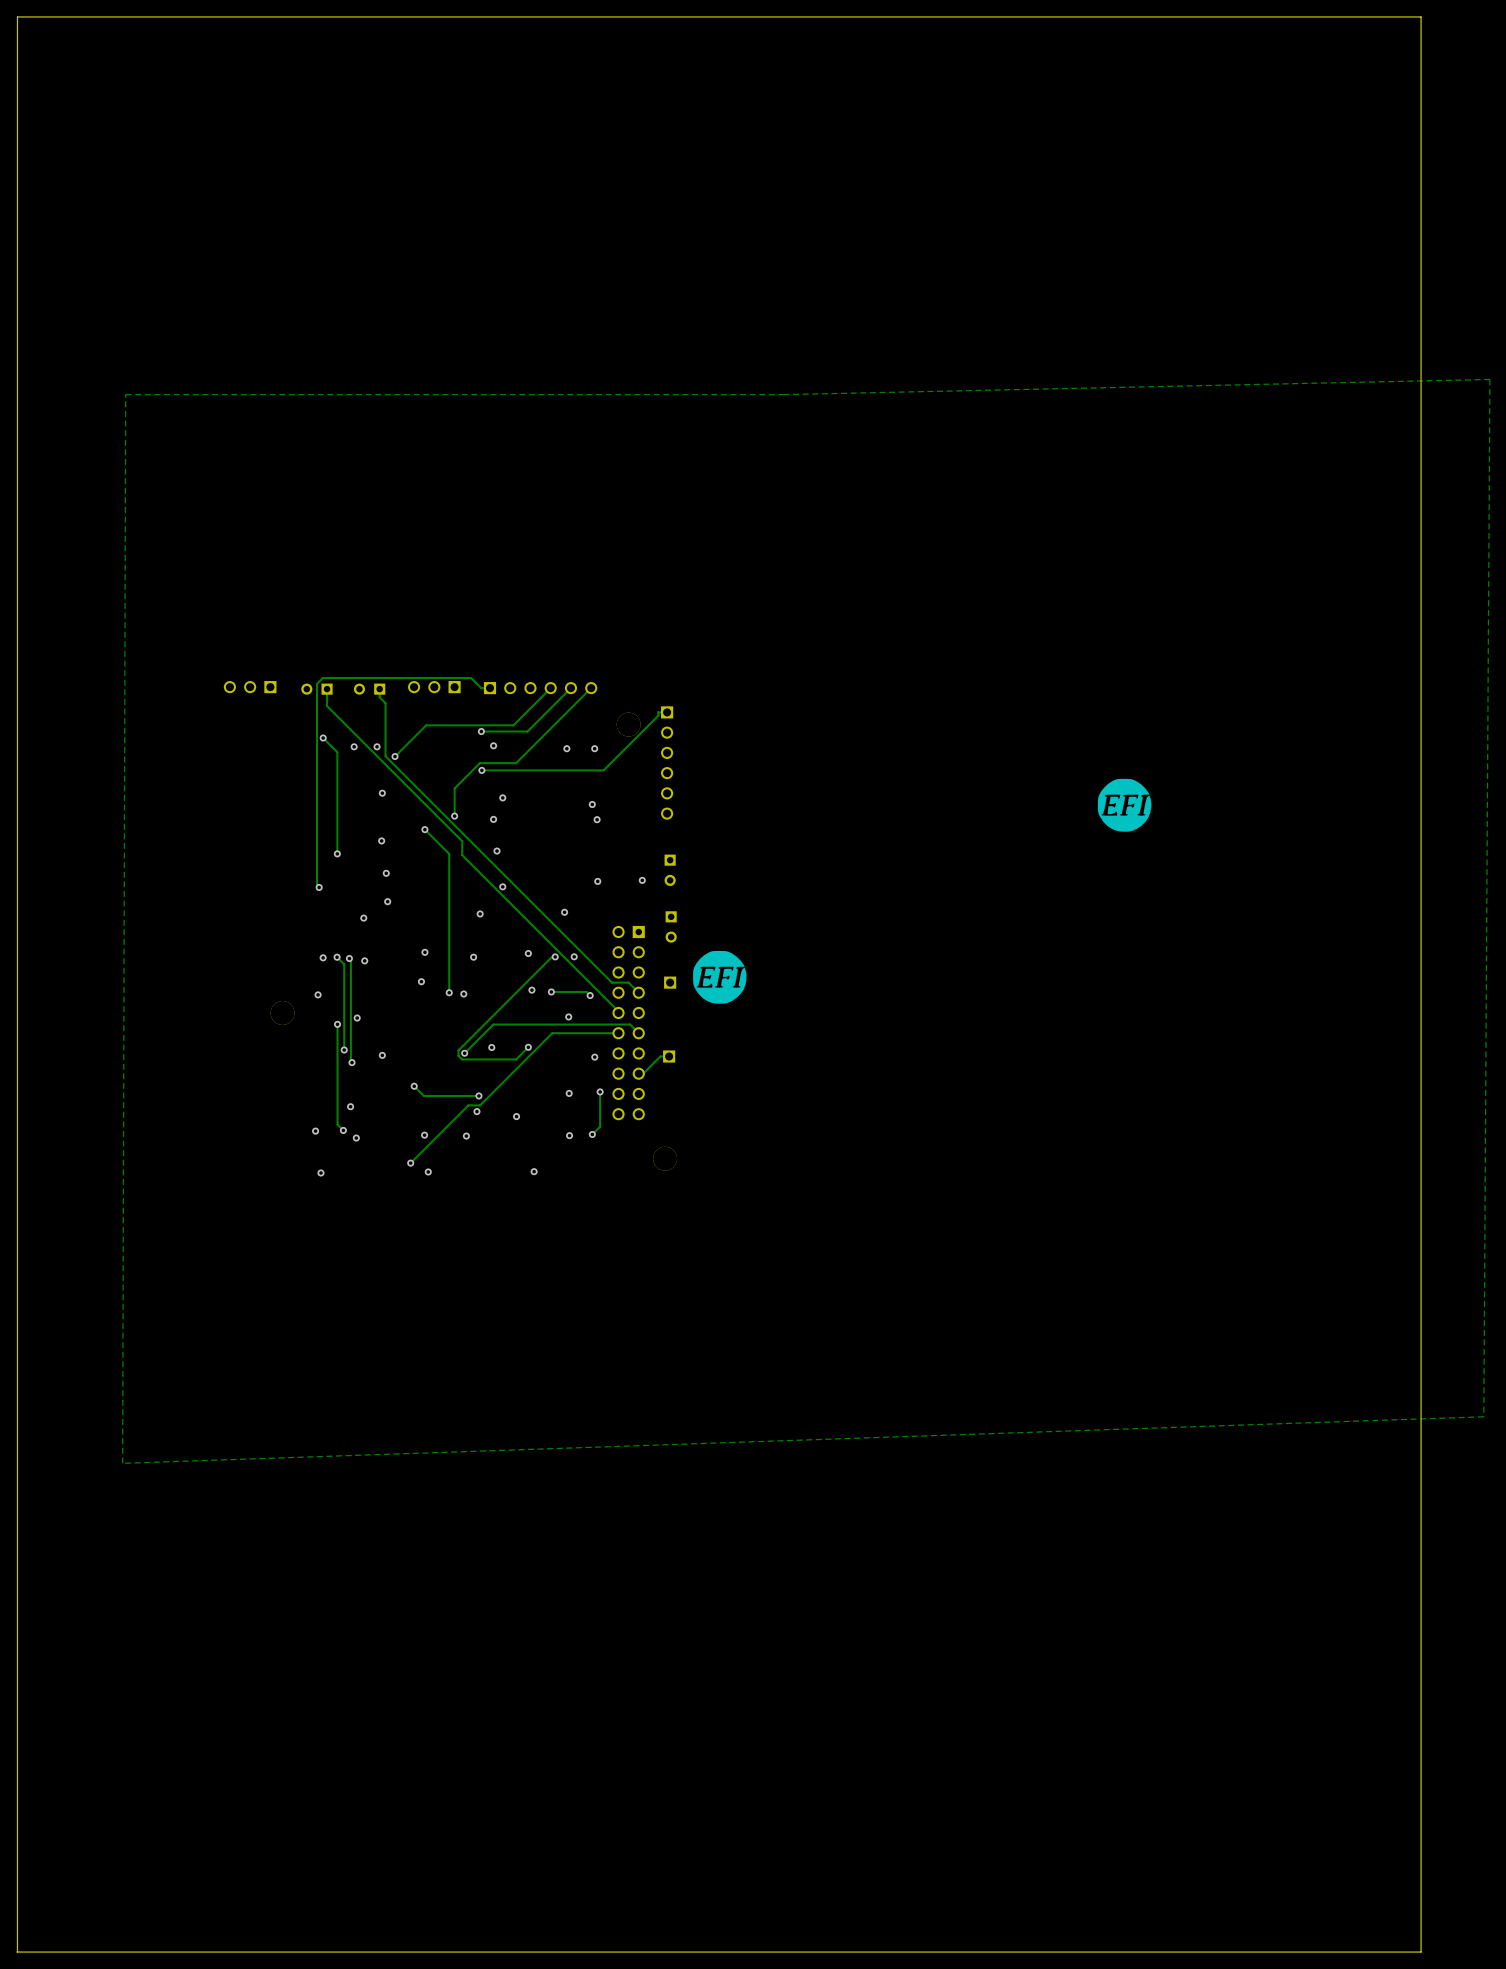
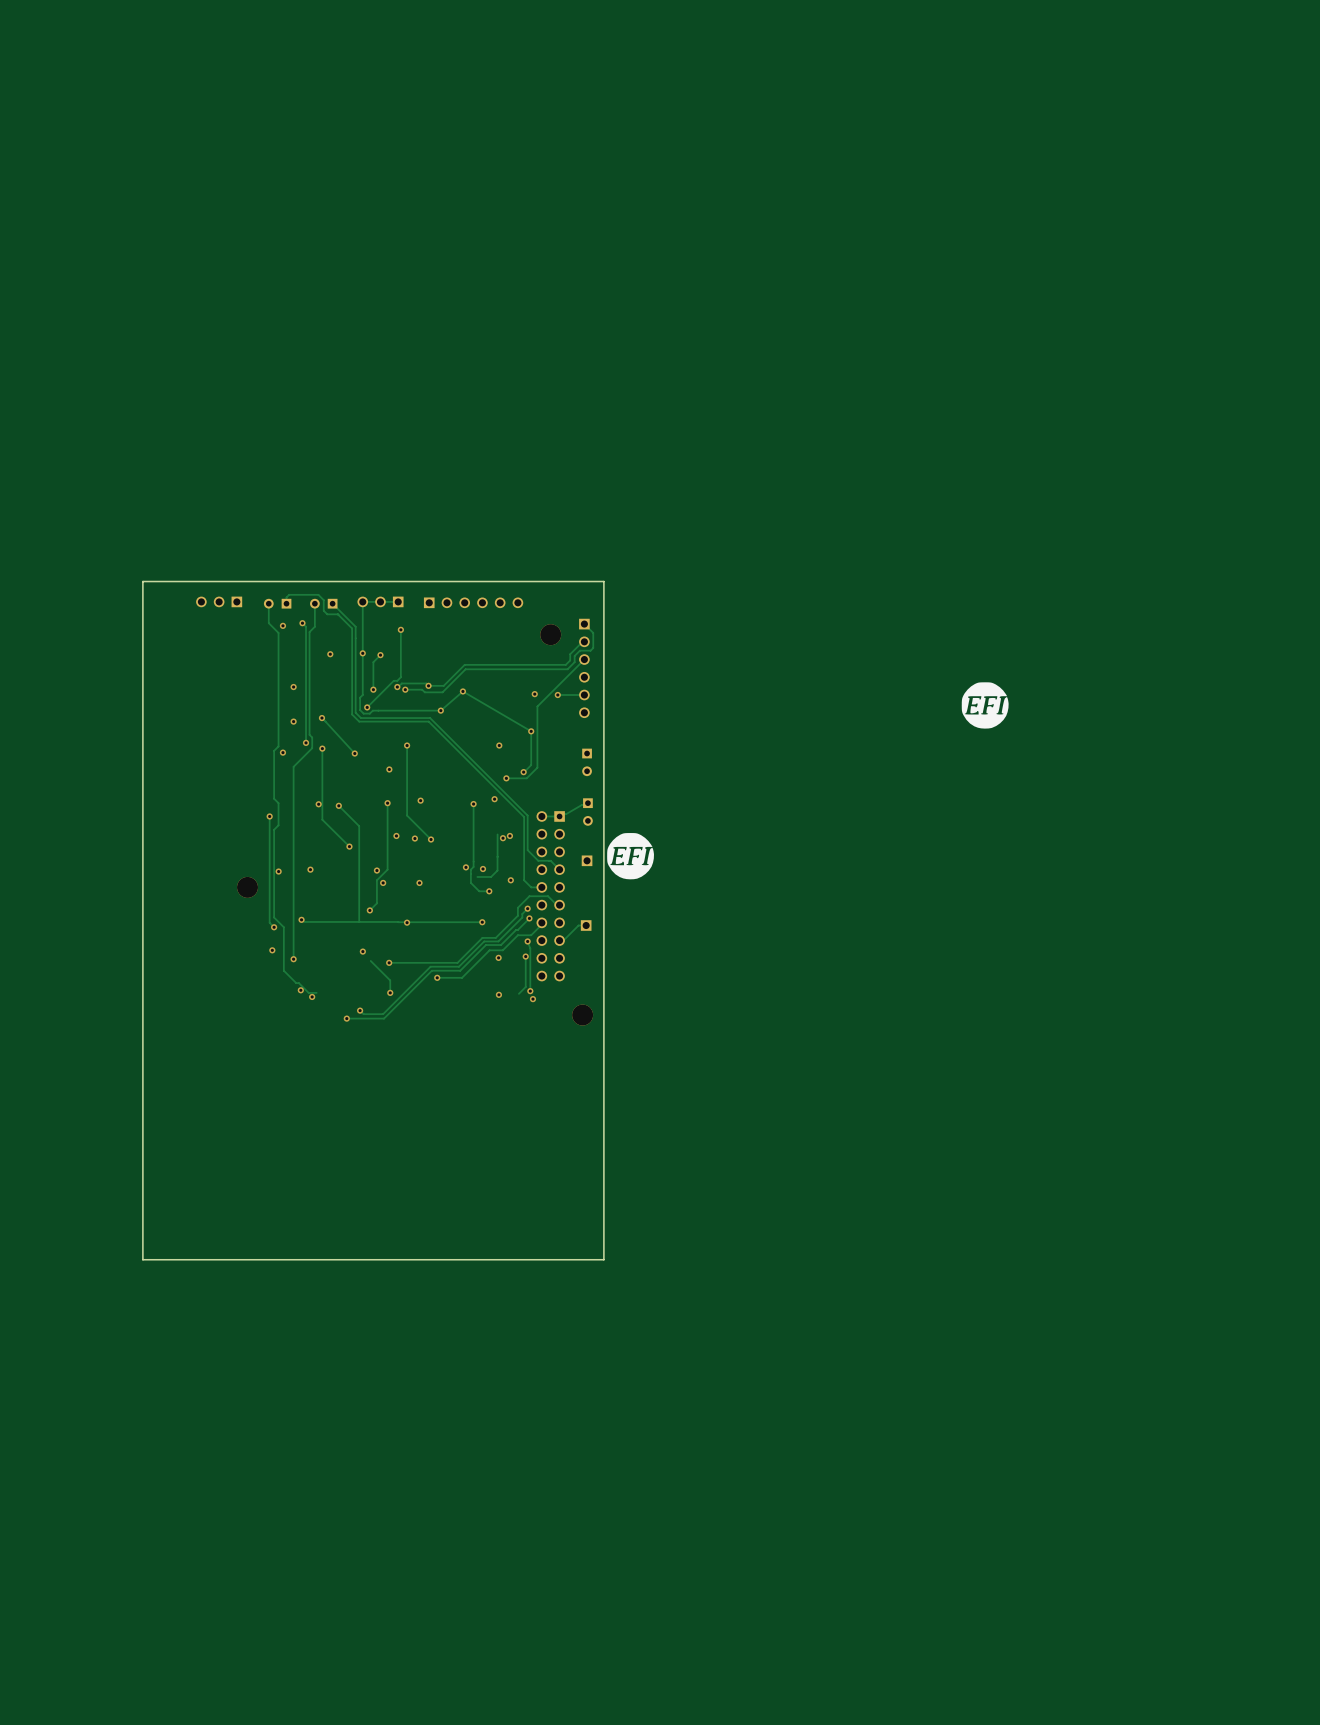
zone outline: (1489, 379) (783, 394) (125, 394) (122, 1463) (1483, 1416) (1489, 379) -> none
board edge: none -> (603, 581) (142, 581) (142, 1259) (603, 1259) (603, 581)
track: none -> (398, 601) (362, 601) (362, 695) (360, 697) (360, 710) (363, 713) (369, 713) (372, 710) (440, 710) (462, 691) (531, 731) (531, 765) (524, 771)
track: (490, 688) (481, 688) (471, 677) (322, 677) (317, 683) (317, 885) (319, 887) -> none
track: (550, 688) (513, 725) (426, 725) (395, 756) -> none
track: (570, 688) (527, 731) (481, 731) -> none
track: (591, 688) (516, 763) (479, 763) (454, 788) (454, 816) -> none
track: none -> (268, 603) (268, 623) (278, 632) (278, 746) (274, 750) (274, 798) (278, 803) (278, 825) (274, 829) (274, 917) (283, 927) (283, 970) (308, 992) (316, 992)
track: (327, 689) (327, 706) (462, 841) (462, 855) (618, 1012) -> (286, 603) (286, 597) (289, 594) (318, 594) (323, 600) (323, 610) (327, 614) (337, 614) (352, 628) (352, 714) (359, 721) (428, 721) (524, 817) (524, 880) (531, 887) (541, 887)
track: none -> (314, 603) (314, 626) (309, 632) (309, 734) (312, 737) (312, 748) (293, 766) (293, 959)
track: (379, 689) (379, 697) (385, 703) (385, 756) (611, 982) (614, 982) -> (332, 603) (355, 626) (355, 712) (360, 718) (430, 718) (527, 815) (527, 850) (538, 860)
track: none -> (302, 623) (306, 626) (306, 742)
via: none -> (302, 623)
track: (667, 712) (658, 712) (658, 715) (603, 770) (481, 770) -> (584, 624) (593, 632) (593, 648) (590, 650) (579, 650) (574, 656) (574, 662) (567, 669) (465, 669) (442, 692) (405, 689)
via: none -> (282, 625)
track: none -> (400, 629) (400, 677) (397, 680) (393, 680) (367, 707)
via: none -> (400, 629)
via: (481, 731) -> none
track: none -> (584, 641) (570, 654) (570, 660) (565, 664) (464, 664) (443, 685) (401, 683) (397, 687)
track: (323, 738) (337, 752) (337, 853) -> none
via: (323, 738) -> none
via: none -> (362, 653)
via: (493, 745) -> none
via: (354, 746) -> none
track: none -> (380, 655) (373, 662) (373, 689)
via: none -> (380, 655)
via: (566, 748) -> none
via: (594, 748) -> none
track: none -> (584, 659) (537, 706) (537, 767) (526, 778) (506, 778)
via: (395, 756) -> none
via: (481, 770) -> none
via: none -> (428, 685)
via: none -> (293, 687)
via: none -> (397, 687)
via: none -> (373, 689)
via: none -> (405, 689)
via: none -> (462, 691)
via: none -> (534, 694)
via: (382, 793) -> none
via: none -> (557, 695)
track: none -> (584, 695) (557, 695)
via: (502, 797) -> none
via: (592, 804) -> none
via: none -> (367, 707)
via: none -> (440, 710)
via: (454, 816) -> none
track: none -> (321, 718) (354, 753)
via: none -> (321, 718)
via: (493, 819) -> none
via: (597, 819) -> none
via: none -> (293, 721)
track: (424, 829) (449, 853) (449, 992) -> none
via: (424, 829) -> none
via: none -> (531, 731)
via: (381, 840) -> none
via: none -> (306, 742)
track: none -> (407, 745) (407, 815) (431, 839)
via: none -> (407, 745)
via: (496, 851) -> none
via: none -> (499, 745)
via: (337, 853) -> none
track: none -> (322, 748) (322, 819) (349, 846)
via: none -> (322, 748)
via: none -> (282, 752)
via: none -> (354, 753)
via: (386, 873) -> none
via: none -> (389, 769)
via: (642, 880) -> none
via: (502, 886) -> none
via: (319, 887) -> none
via: none -> (506, 778)
via position: (387, 901) -> (338, 805)
track: none -> (387, 803) (387, 869) (376, 880) (376, 903) (369, 910)
via: none -> (387, 803)
track: none -> (587, 803) (559, 816) (541, 816)
track: none -> (473, 804) (473, 867) (470, 869) (470, 882) (479, 891) (489, 891)
via: none -> (473, 804)
track: none -> (338, 805) (359, 826) (359, 921)
track: none -> (269, 816) (269, 922) (274, 927)
via: none -> (269, 816)
via: (424, 952) -> none
track: none -> (497, 834) (497, 856)
via: (528, 953) -> none
via: none -> (396, 835)
via: none -> (509, 835)
track: (555, 956) (552, 956) (458, 1050) (458, 1055) (462, 1059) (516, 1059) (528, 1047) -> none
via: (555, 956) -> none
via: (323, 957) -> none
track: (337, 957) (344, 964) (344, 1050) -> none
via: (337, 957) -> none
track: (349, 958) (352, 1062) -> none
via: (349, 958) -> none
via: none -> (431, 839)
via: (364, 960) -> none
via: none -> (349, 846)
track: none -> (497, 856) (497, 870) (491, 876) (477, 876)
via: (421, 981) -> none
track: (551, 991) (586, 991) (590, 995) -> none
via: none -> (310, 869)
via: (449, 992) -> none
via: none -> (376, 870)
via: (463, 994) -> none
via: (590, 995) -> none
via: none -> (510, 880)
via: none -> (383, 882)
via: none -> (419, 882)
via: (568, 1016) -> none
via: none -> (489, 891)
via: (357, 1018) -> none
track: (337, 1024) (337, 1124) (343, 1130) -> none
via: (337, 1024) -> none
track: (618, 1033) (552, 1033) (480, 1105) (468, 1105) (410, 1163) -> none
track: (638, 1033) (630, 1024) (493, 1024) (464, 1053) -> (559, 905) (556, 905) (548, 896) (529, 896) (517, 907) (517, 915) (495, 937) (482, 937) (457, 962) (389, 962)
track: none -> (527, 908) (522, 913) (522, 917) (498, 941) (484, 941) (458, 966) (430, 966) (383, 1014) (363, 1014) (360, 1010)
via: none -> (527, 908)
via: none -> (369, 910)
via: (491, 1047) -> none
via: (528, 1047) -> none
track: none -> (529, 918) (501, 945) (485, 945) (460, 970) (431, 970) (384, 1018) (346, 1018)
via: none -> (529, 918)
track: none -> (304, 921) (482, 922)
via: none -> (482, 922)
track: none -> (541, 922) (531, 935) (517, 935) (502, 950) (489, 950) (462, 977) (437, 977)
via: (382, 1055) -> none
via: (594, 1057) -> none
via: none -> (274, 927)
via: (352, 1062) -> none
track: none -> (527, 941) (530, 948) (530, 991)
via: none -> (527, 941)
via: none -> (272, 950)
track: (414, 1086) (423, 1095) (478, 1095) -> none
via: none -> (293, 959)
via: (478, 1095) -> none
track: none -> (370, 960) (390, 980) (390, 992)
via: none -> (389, 962)
via: (350, 1106) -> none
via: (476, 1111) -> none
via: none -> (437, 977)
via: (516, 1116) -> none
via: (315, 1131) -> none
via: none -> (530, 991)
via: none -> (390, 992)
via: (592, 1134) -> none
via: (424, 1135) -> none
via: (466, 1136) -> none
via: none -> (532, 999)
via: none -> (360, 1010)
via: none -> (346, 1018)
via: (410, 1163) -> none
via: (428, 1171) -> none
via: (534, 1171) -> none
via: (320, 1173) -> none
board edge: (17, 1952) (17, 16) (1421, 16) (1421, 1952) (16, 1952) -> none

